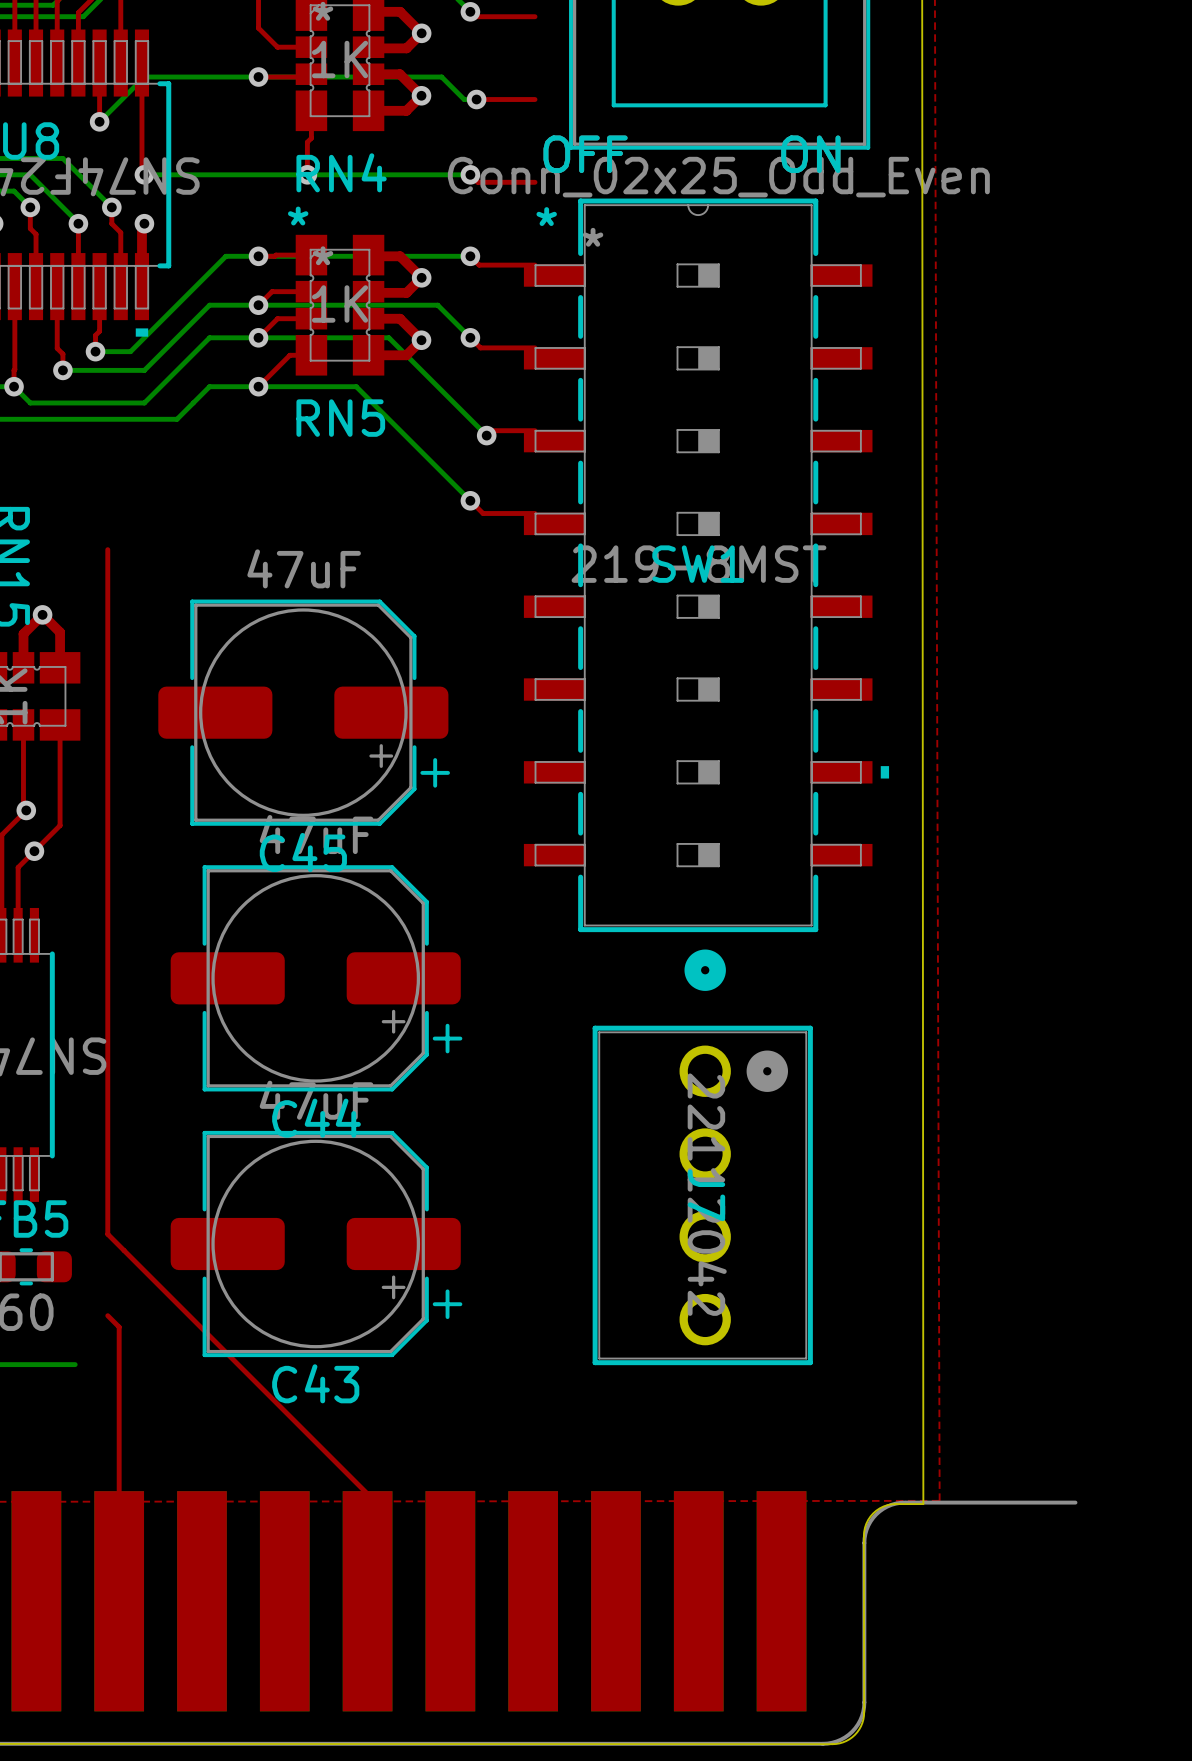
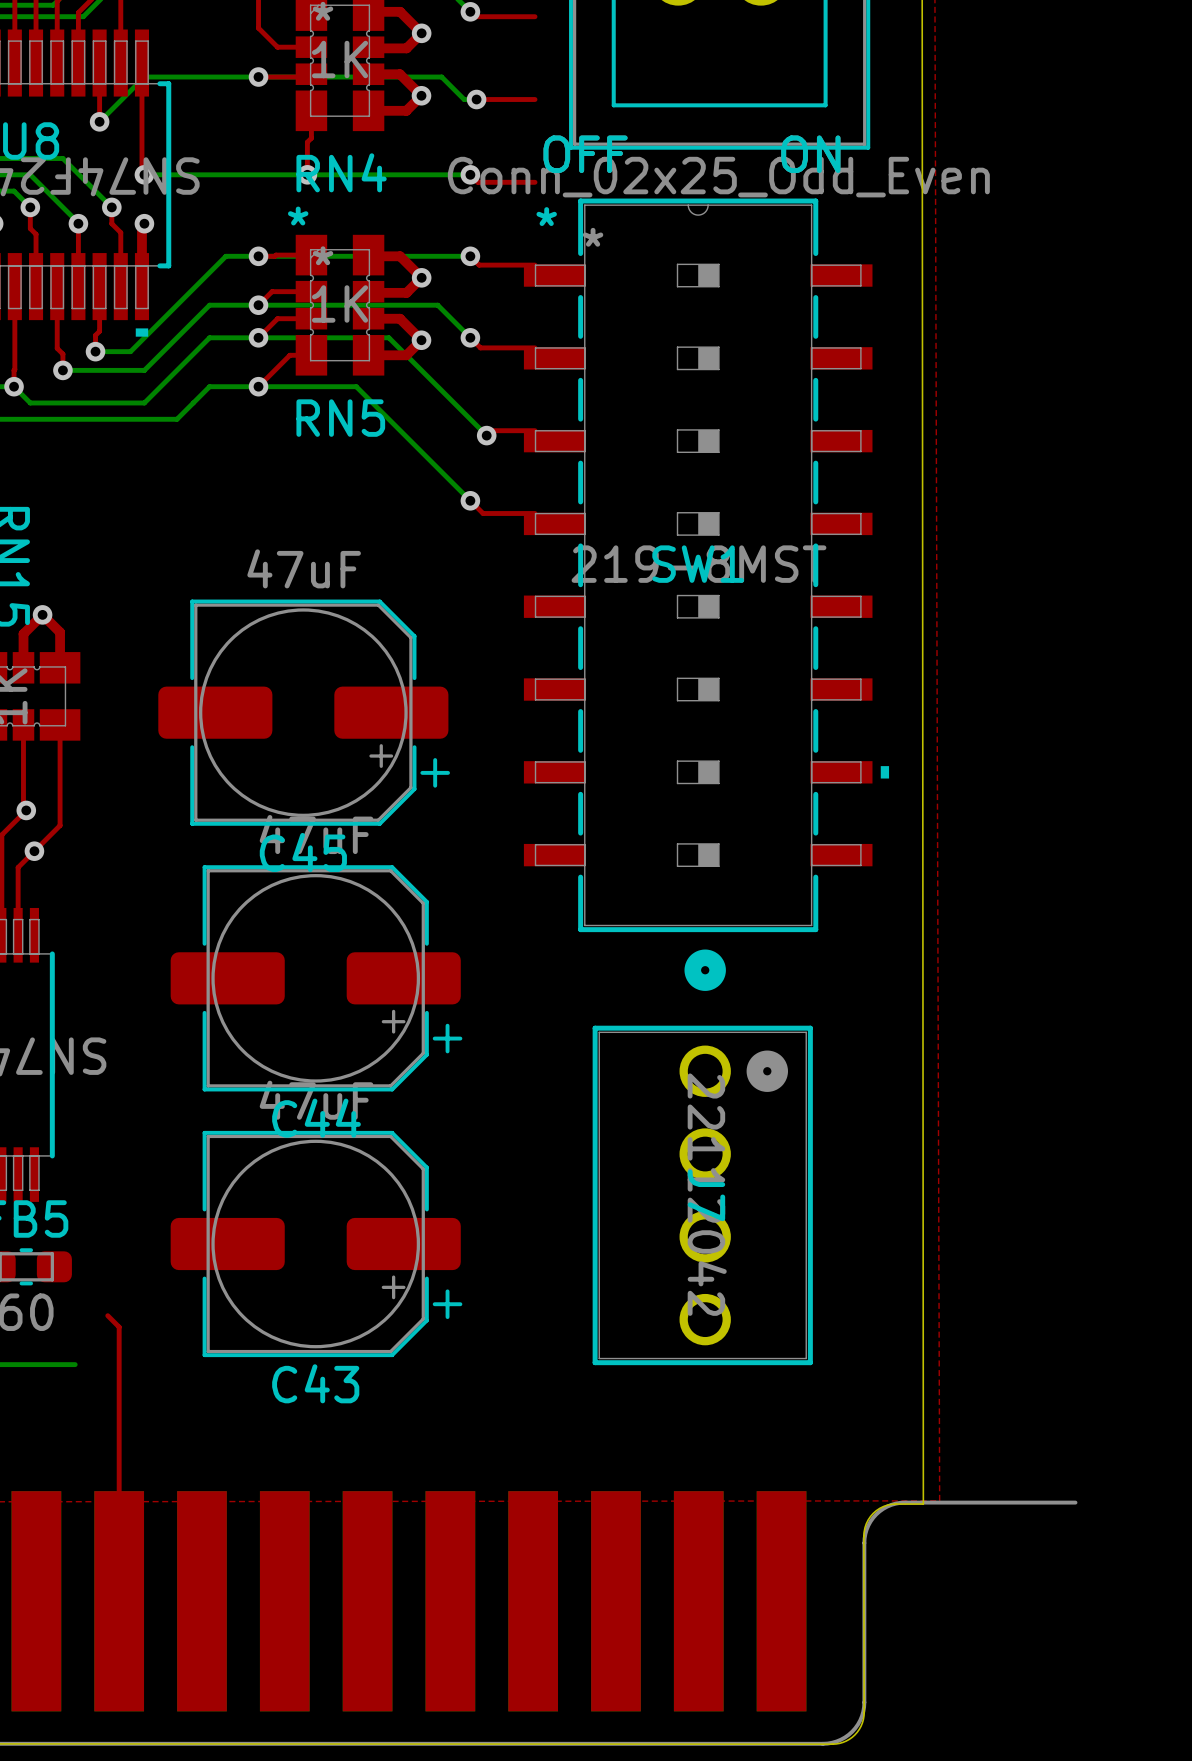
top track: (107, 549) (107, 1234) (367, 1494) (367, 1601) -> none

